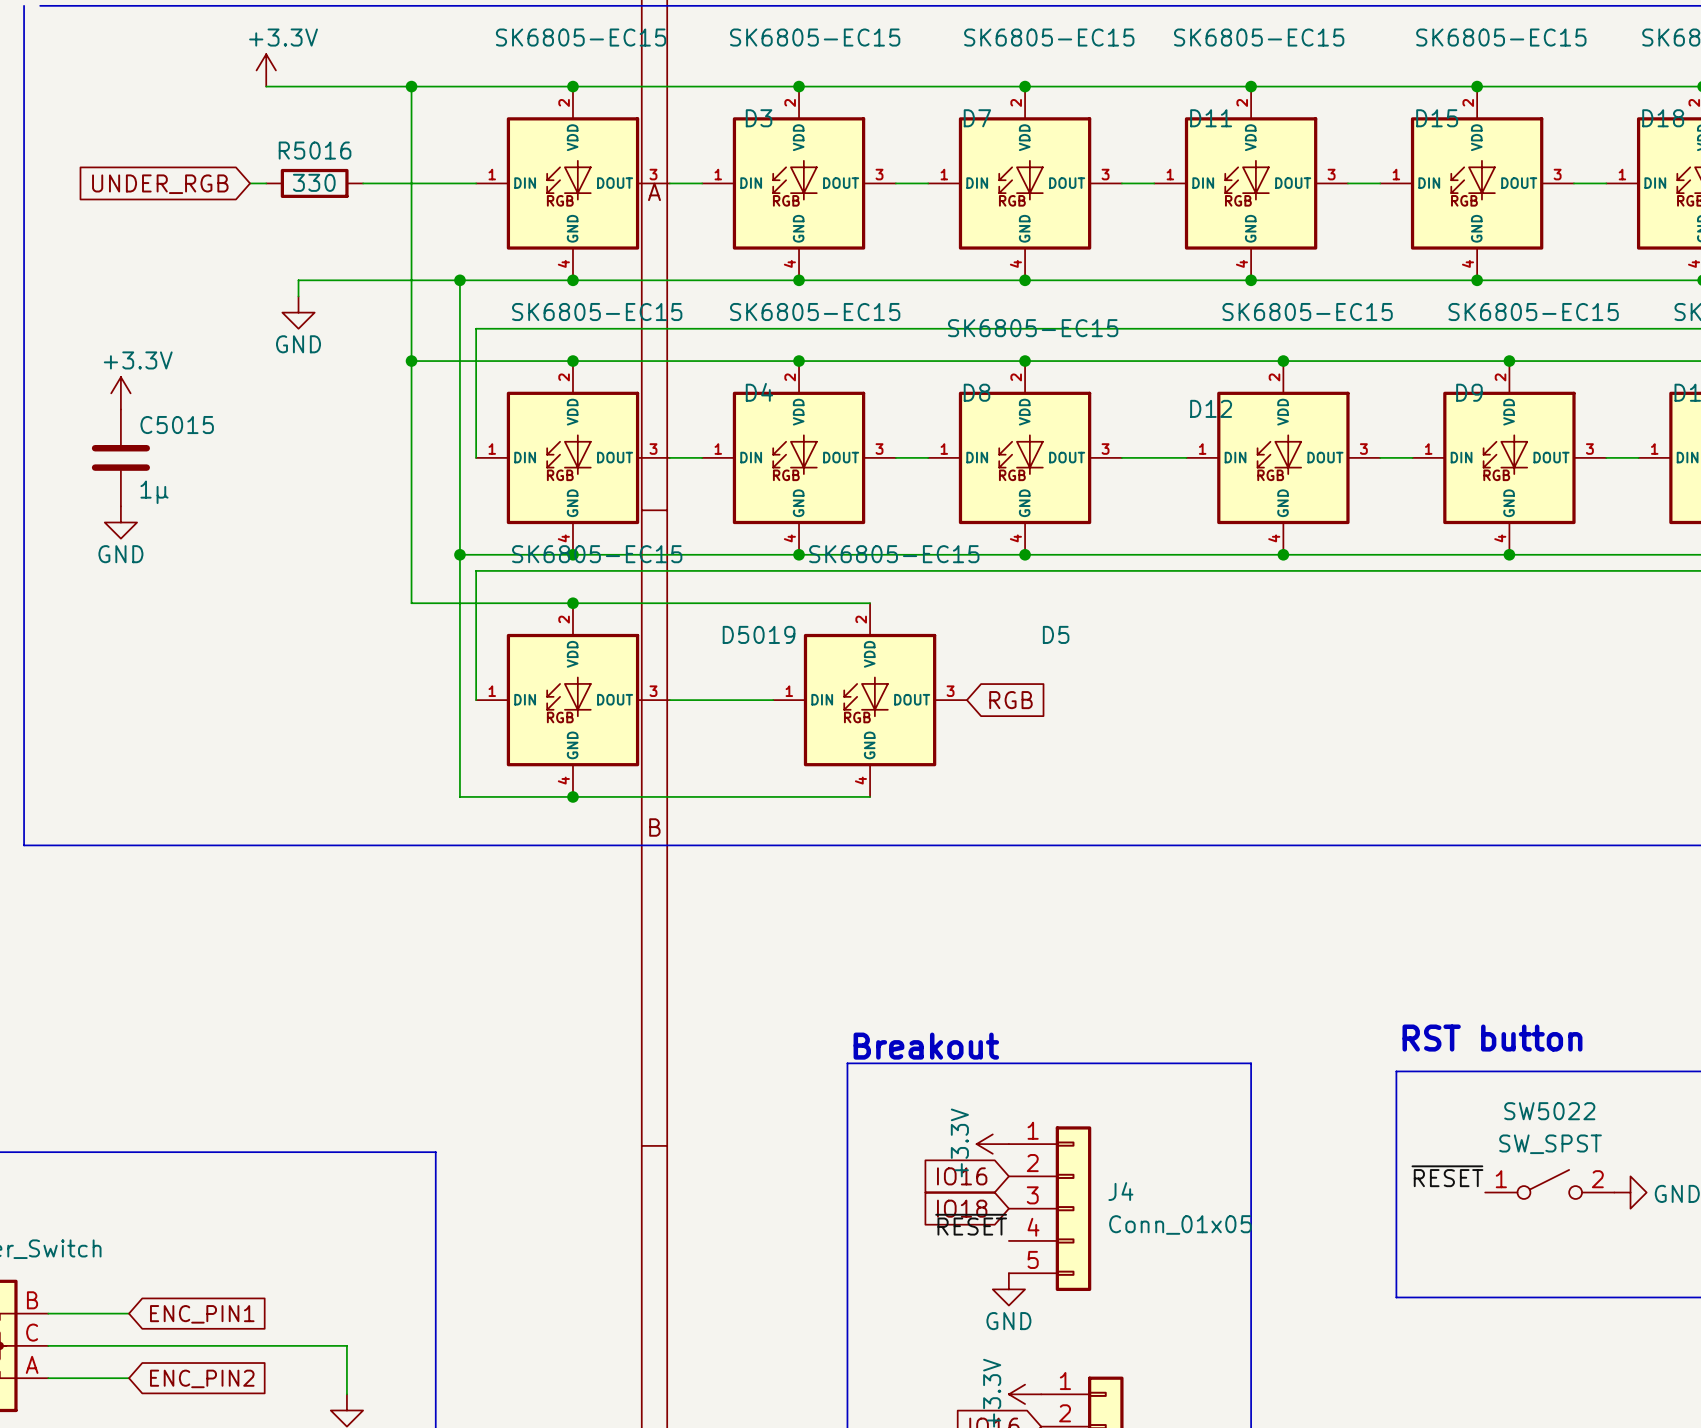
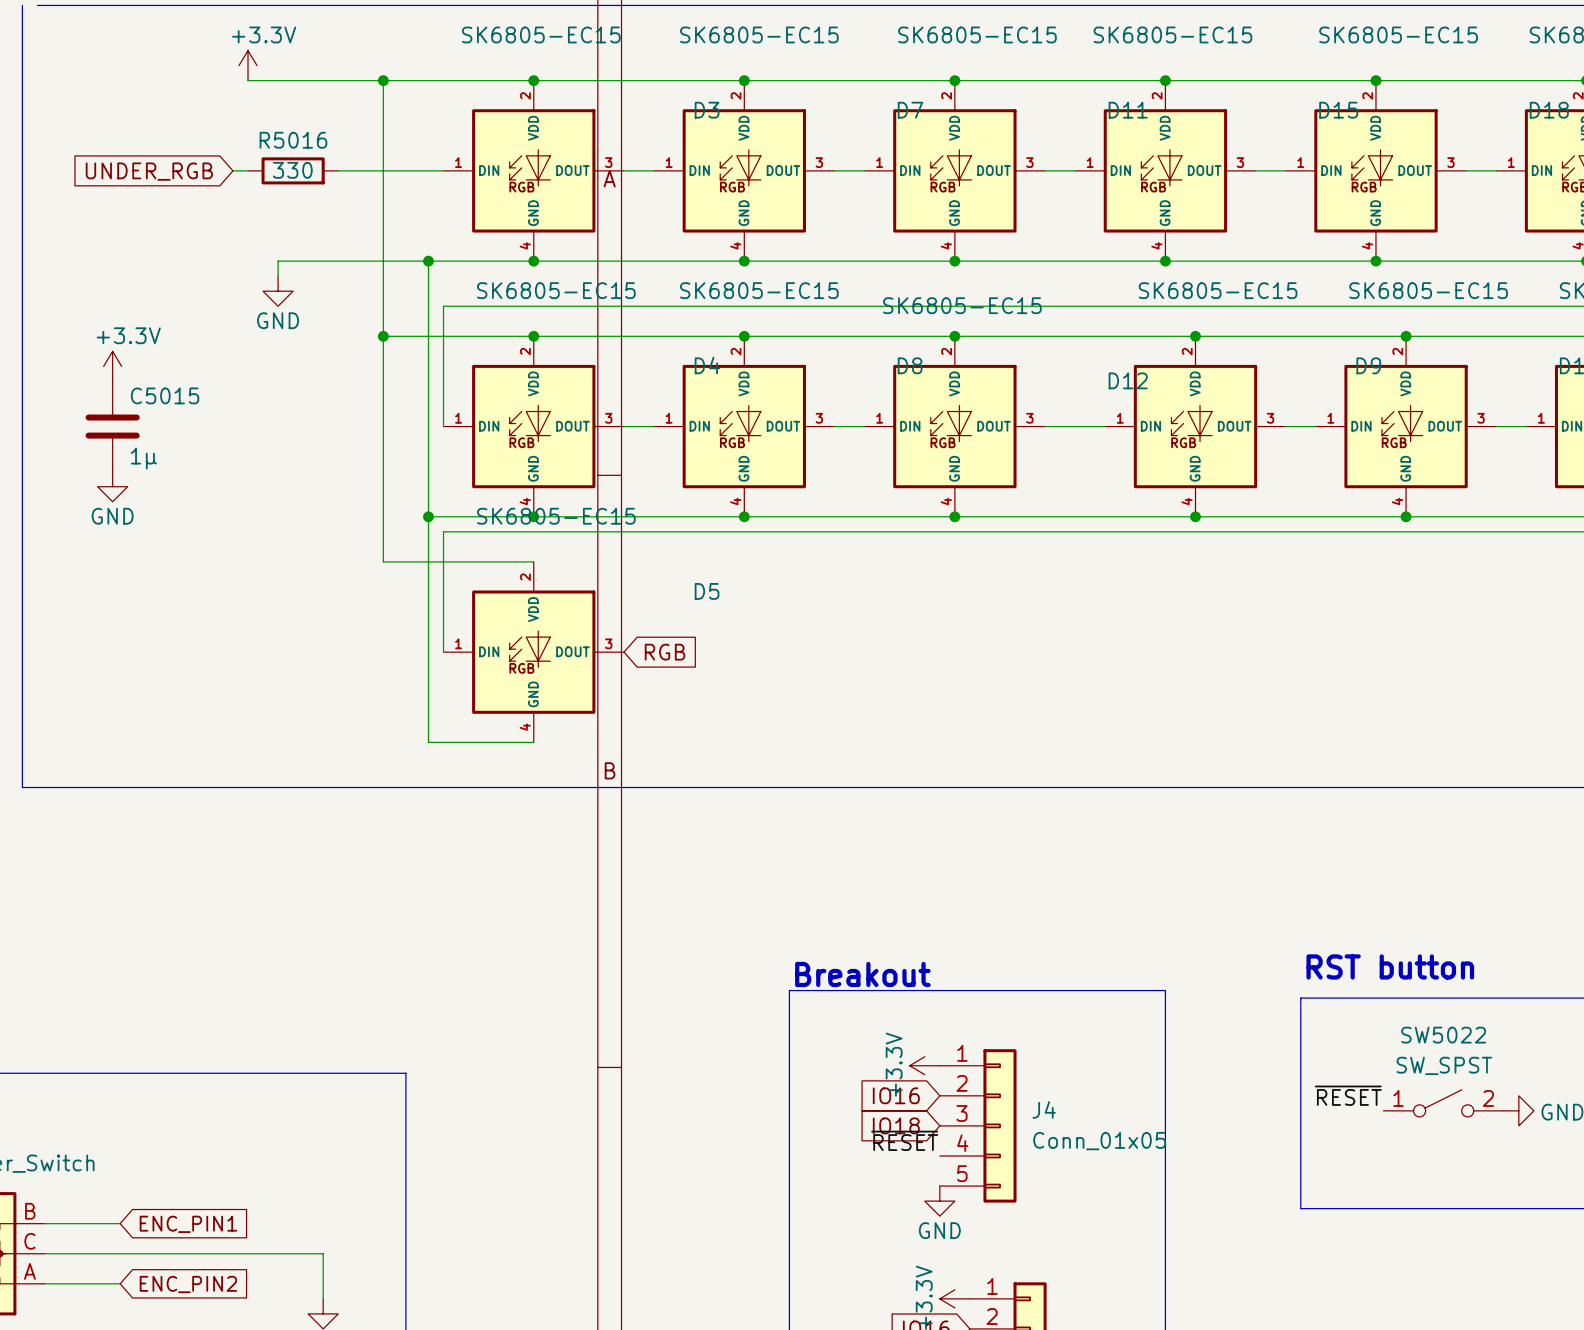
wire: (572, 603) (870, 603) -> none
junction: (572, 603) -> none
D5019 name: D5019 (759, 634) -> D5 (707, 591)
wire: (669, 700) (773, 700) -> none
D5: SK6805-EC15 (870, 700) -> none
global label position: RGB (1010, 700) -> RGB (665, 652)
wire: (572, 796) (870, 796) -> none
junction: (572, 796) -> none

